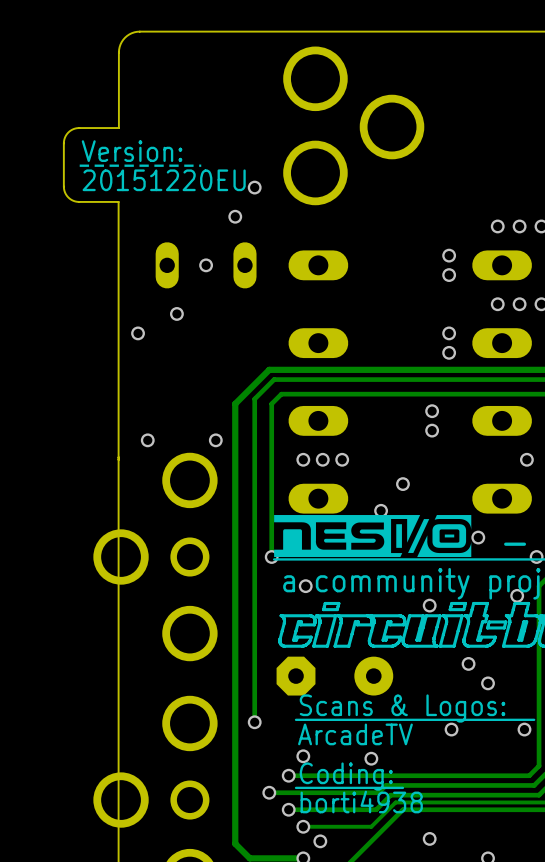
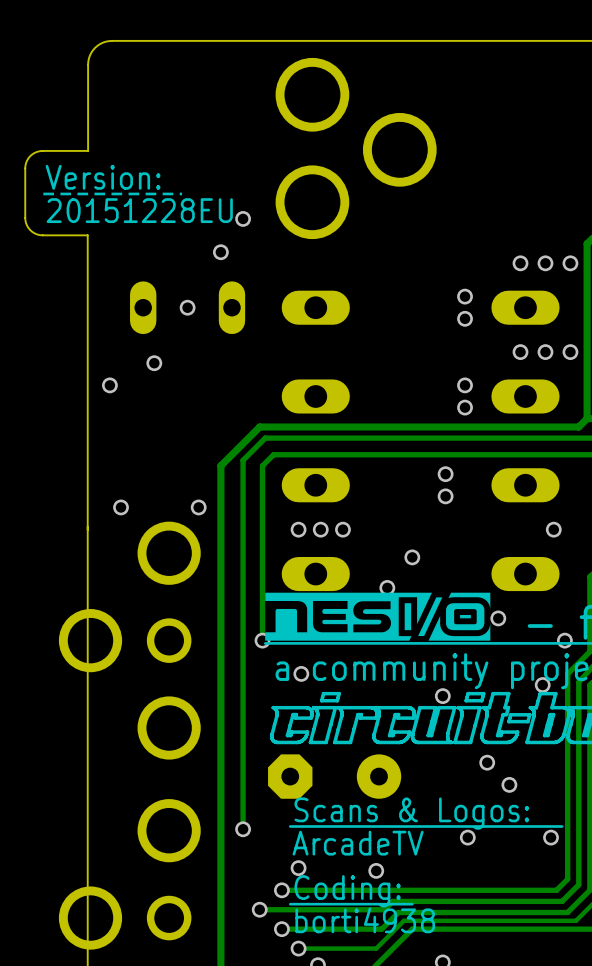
text: 20151220EU (164, 180) -> 20151228EU (139, 210)

